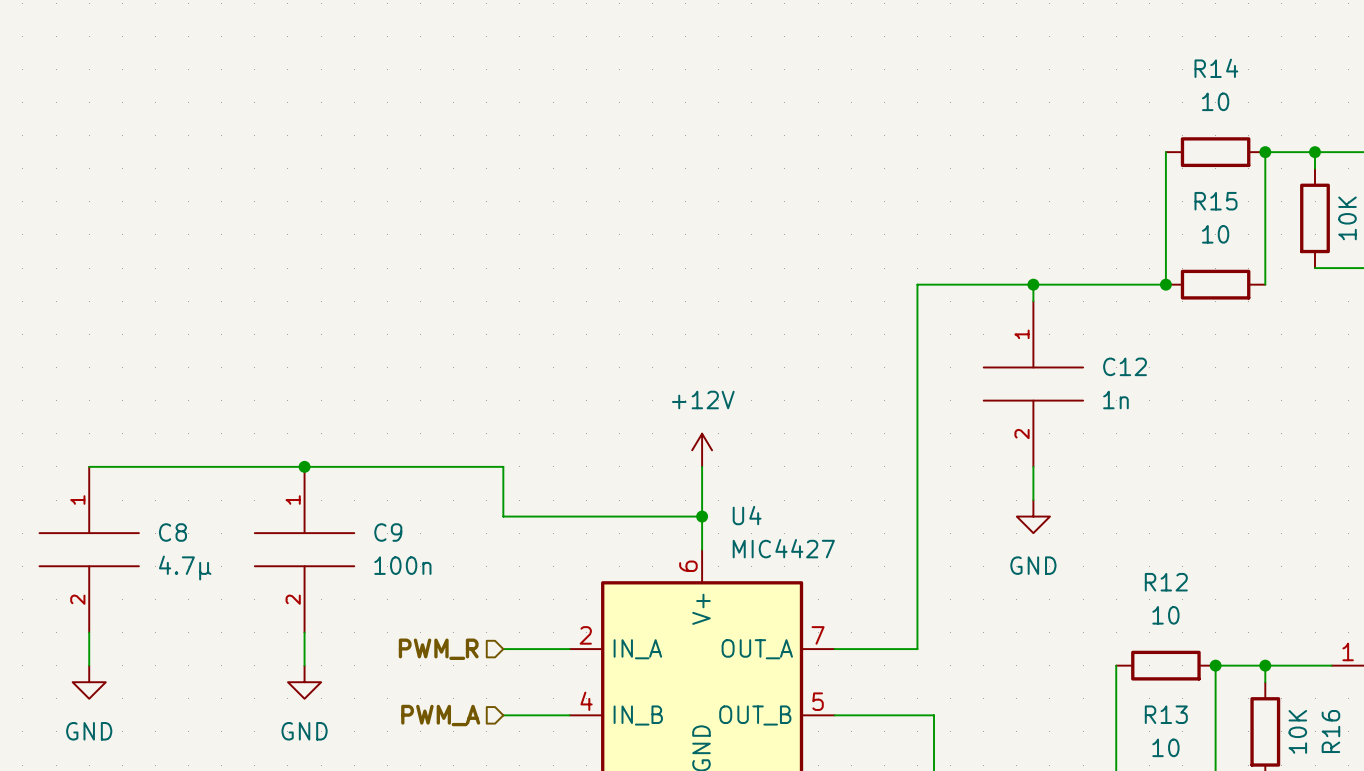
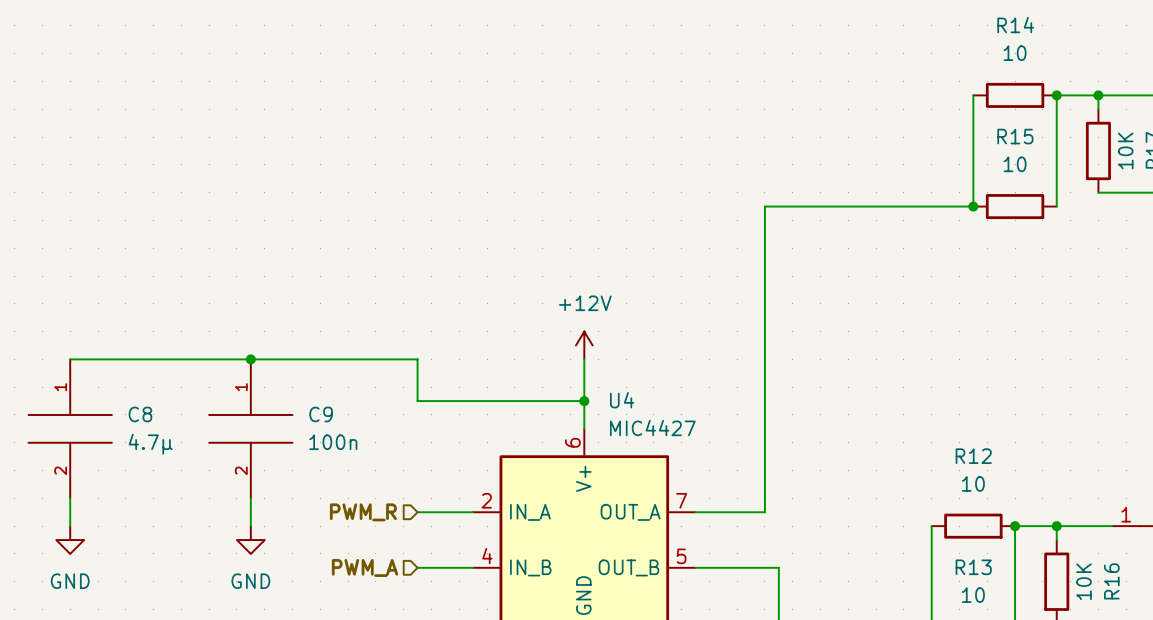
wire: (1033, 284) (1033, 301) -> none
junction: (1033, 284) -> none
C12: 1n (1033, 384) -> none
wire: (1033, 466) (1033, 500) -> none
power symbol: GND (1033, 516) -> none

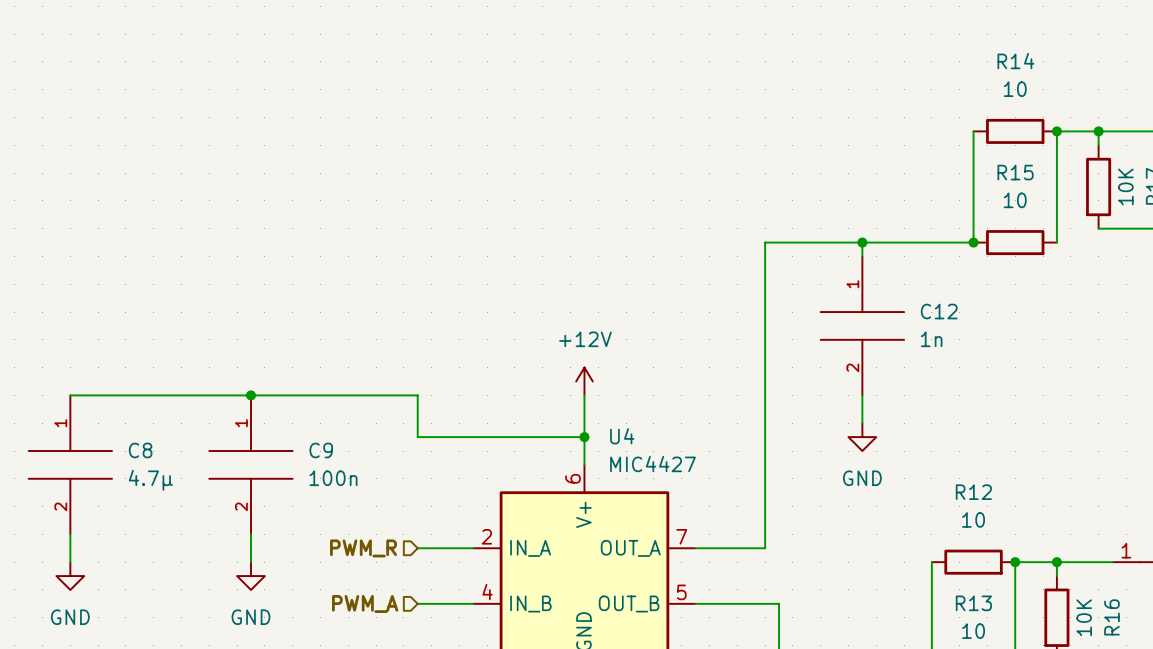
wire: none -> (862, 242) (862, 256)
junction: none -> (862, 242)
C12: none -> 1n (862, 325)
wire: none -> (862, 395) (862, 423)
power symbol: none -> GND (862, 437)

